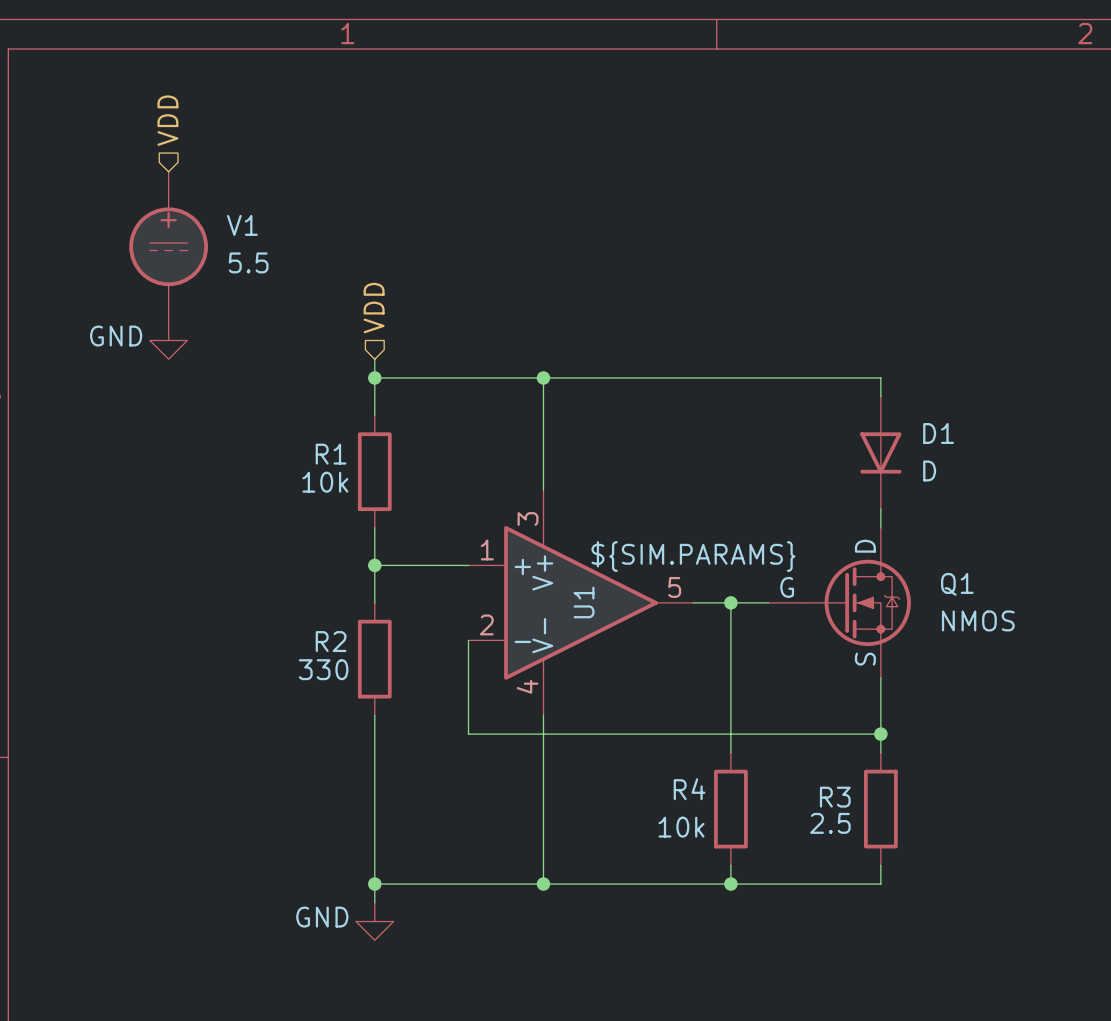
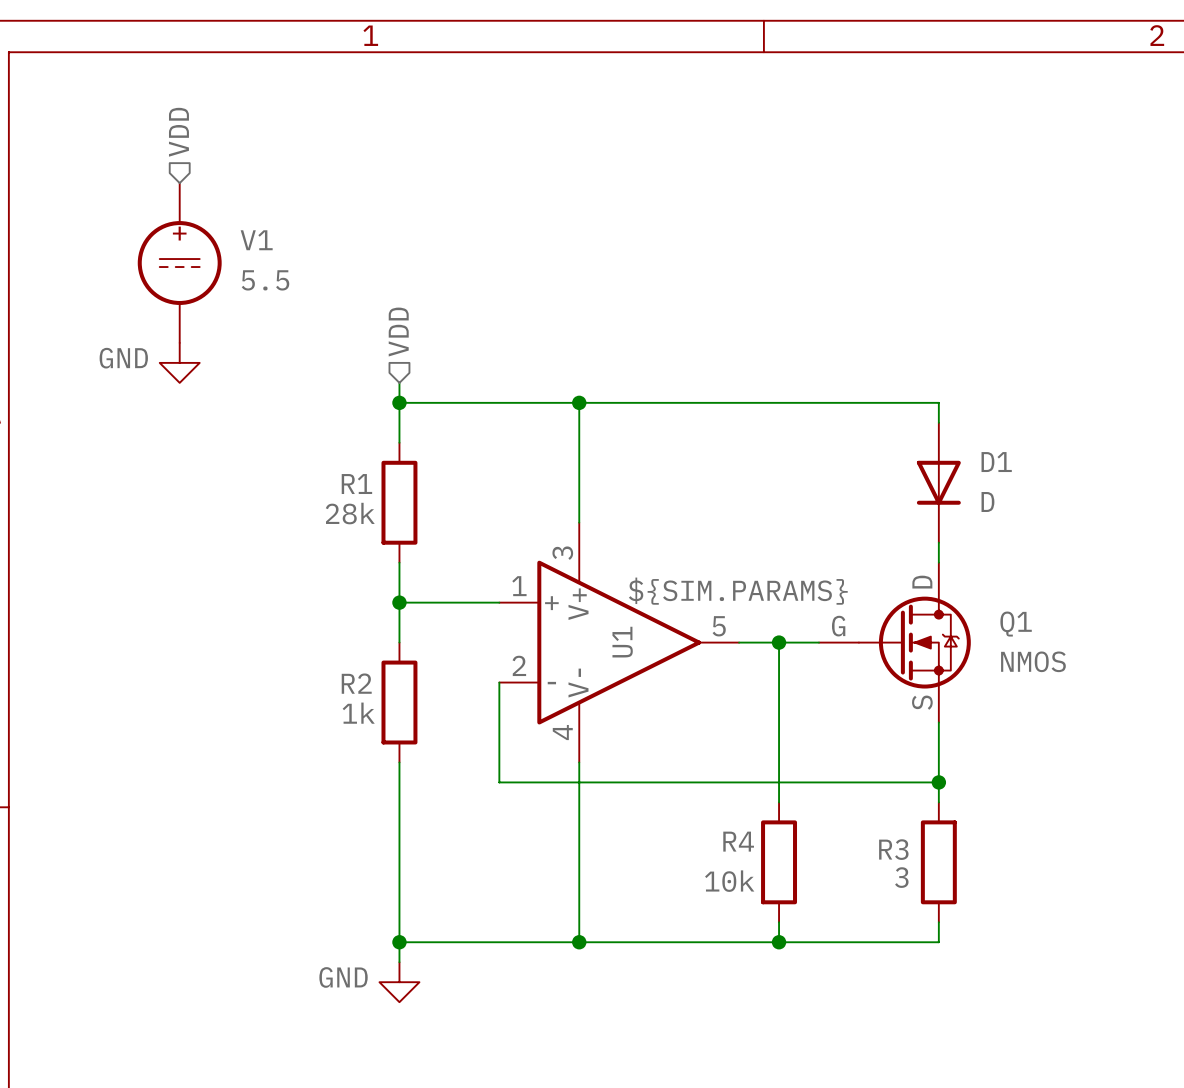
R1 value: 10k (325, 482) -> 28k (350, 513)
R2 value: 330 (323, 669) -> 1k (358, 713)
R3 value: 2.5 (830, 823) -> 3 (901, 877)

